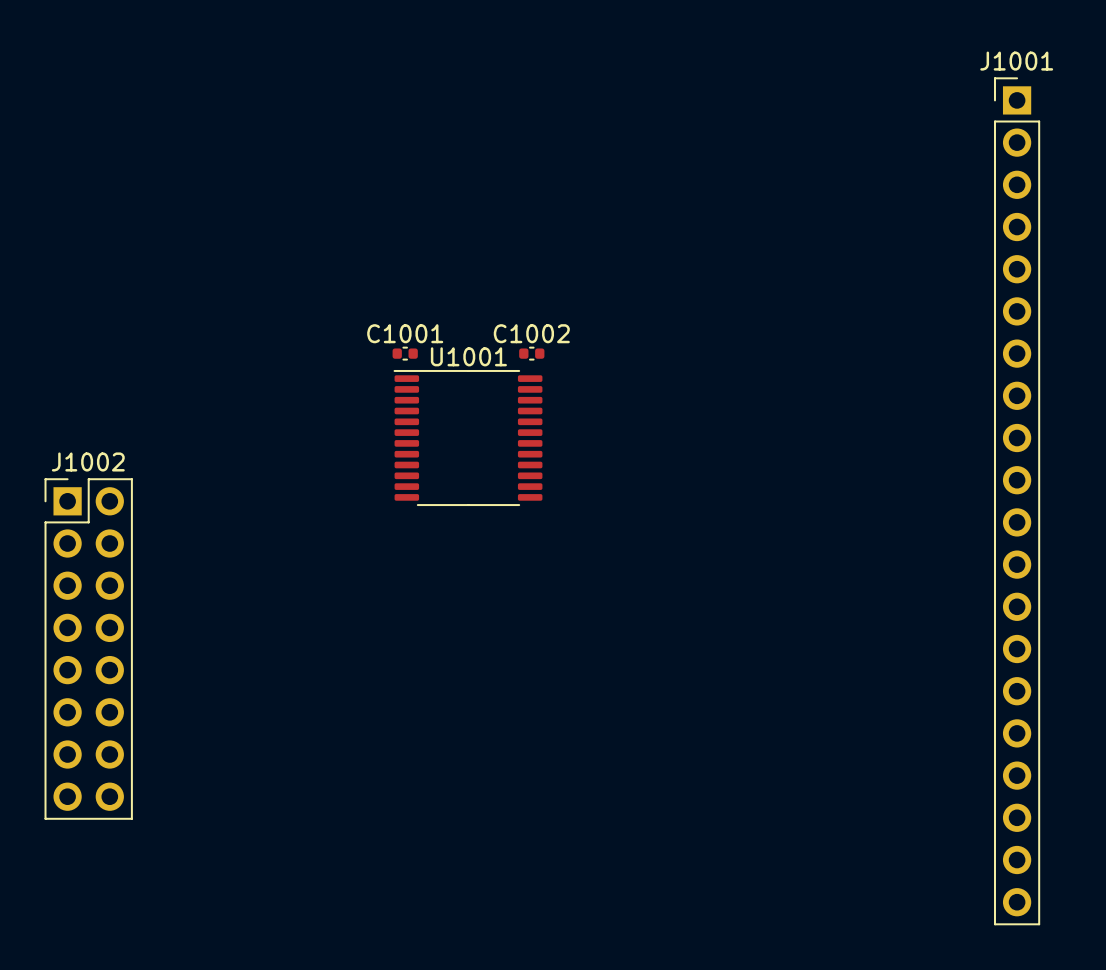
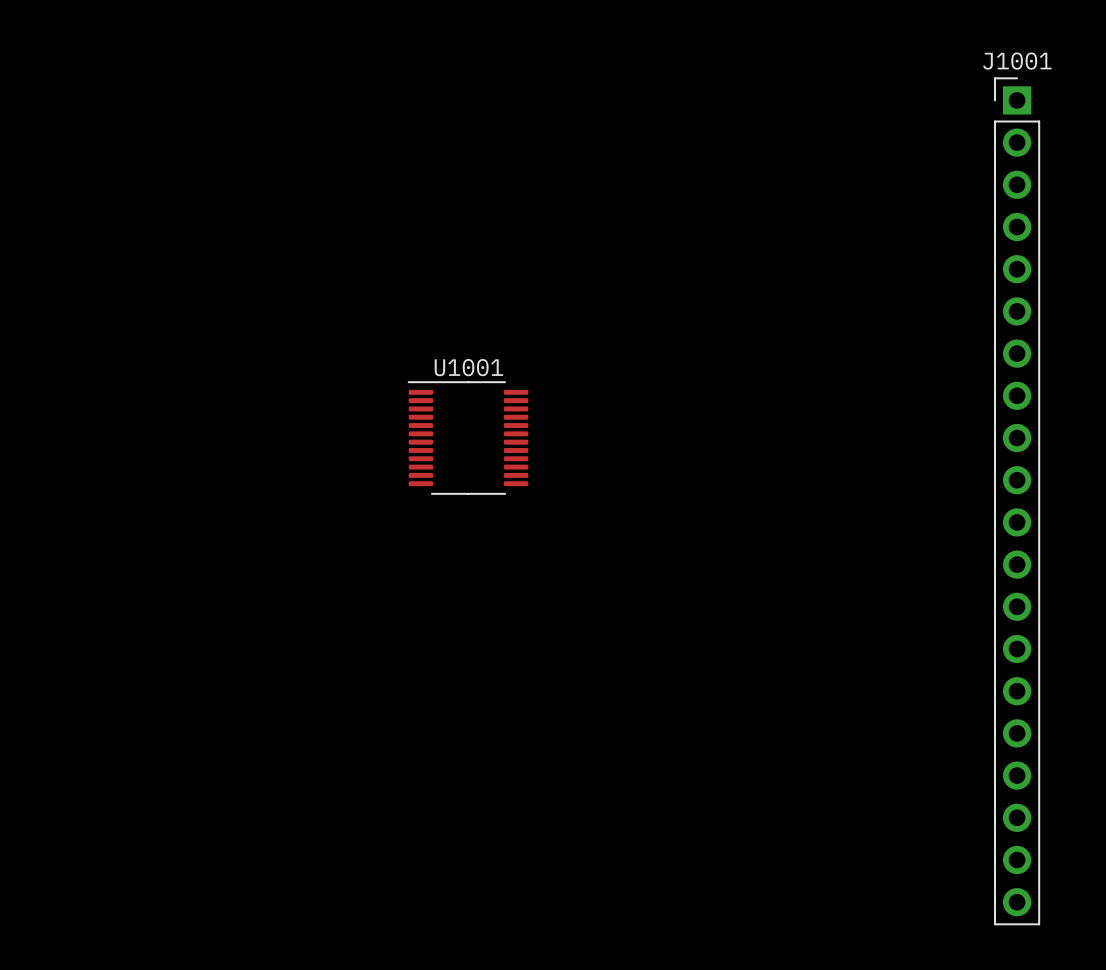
C1001: (405, 353) -> none
C1002: (531, 353) -> none
U1001 footprint: [393, 369, 543, 507] -> [407, 381, 529, 495]
J1002: (88, 649) -> none

